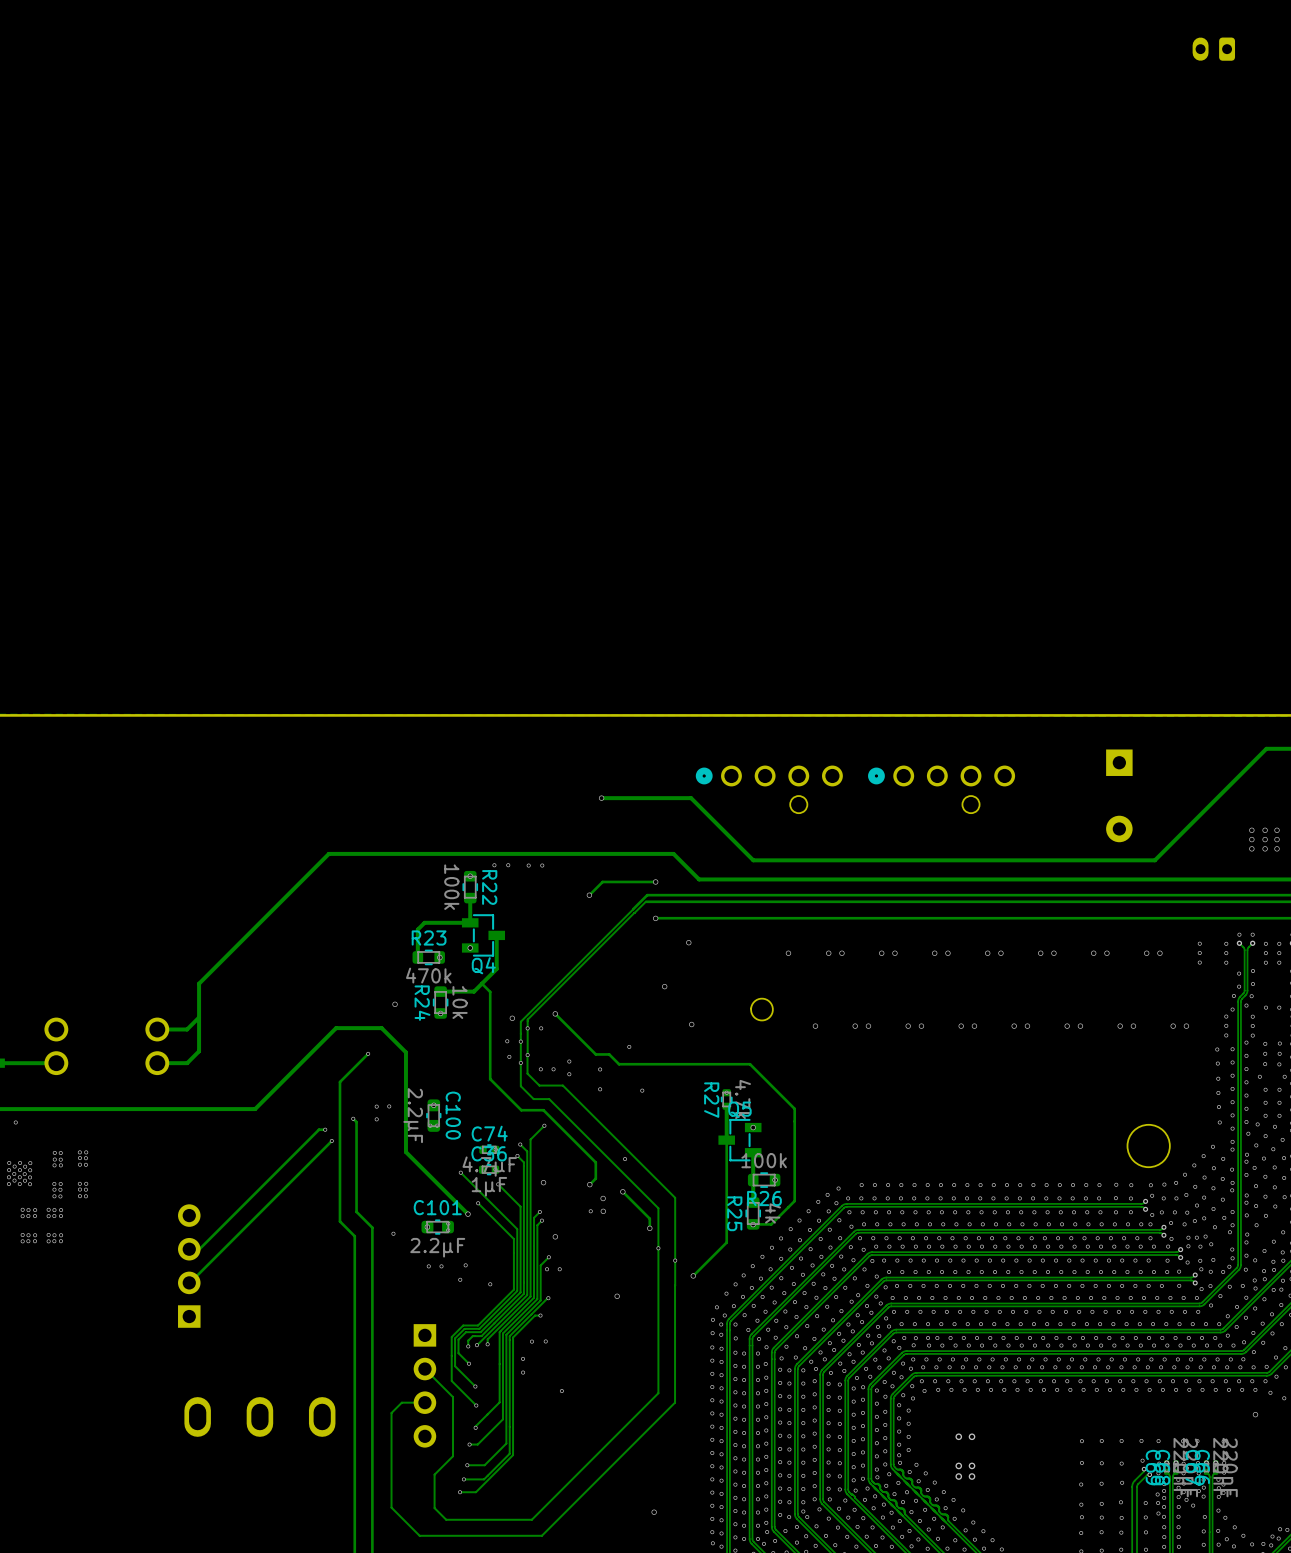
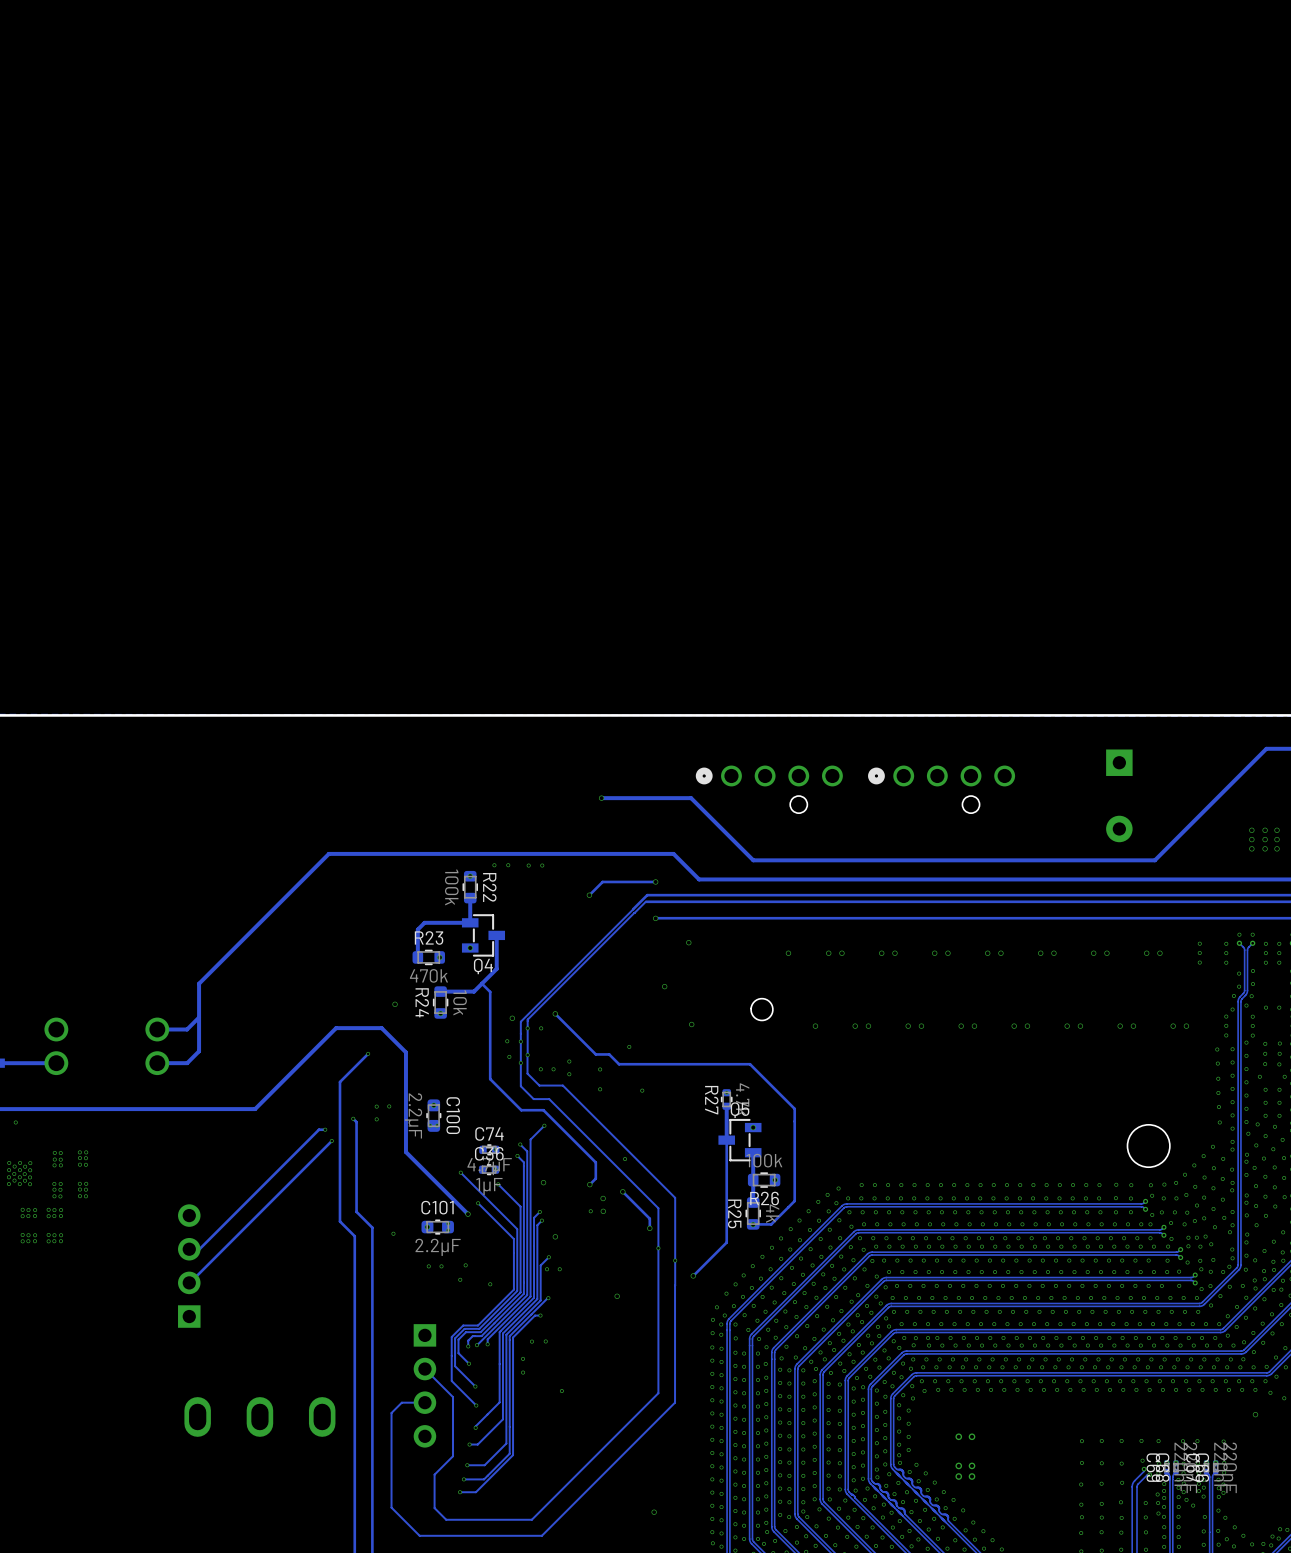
part: (1213, 49) -> none

